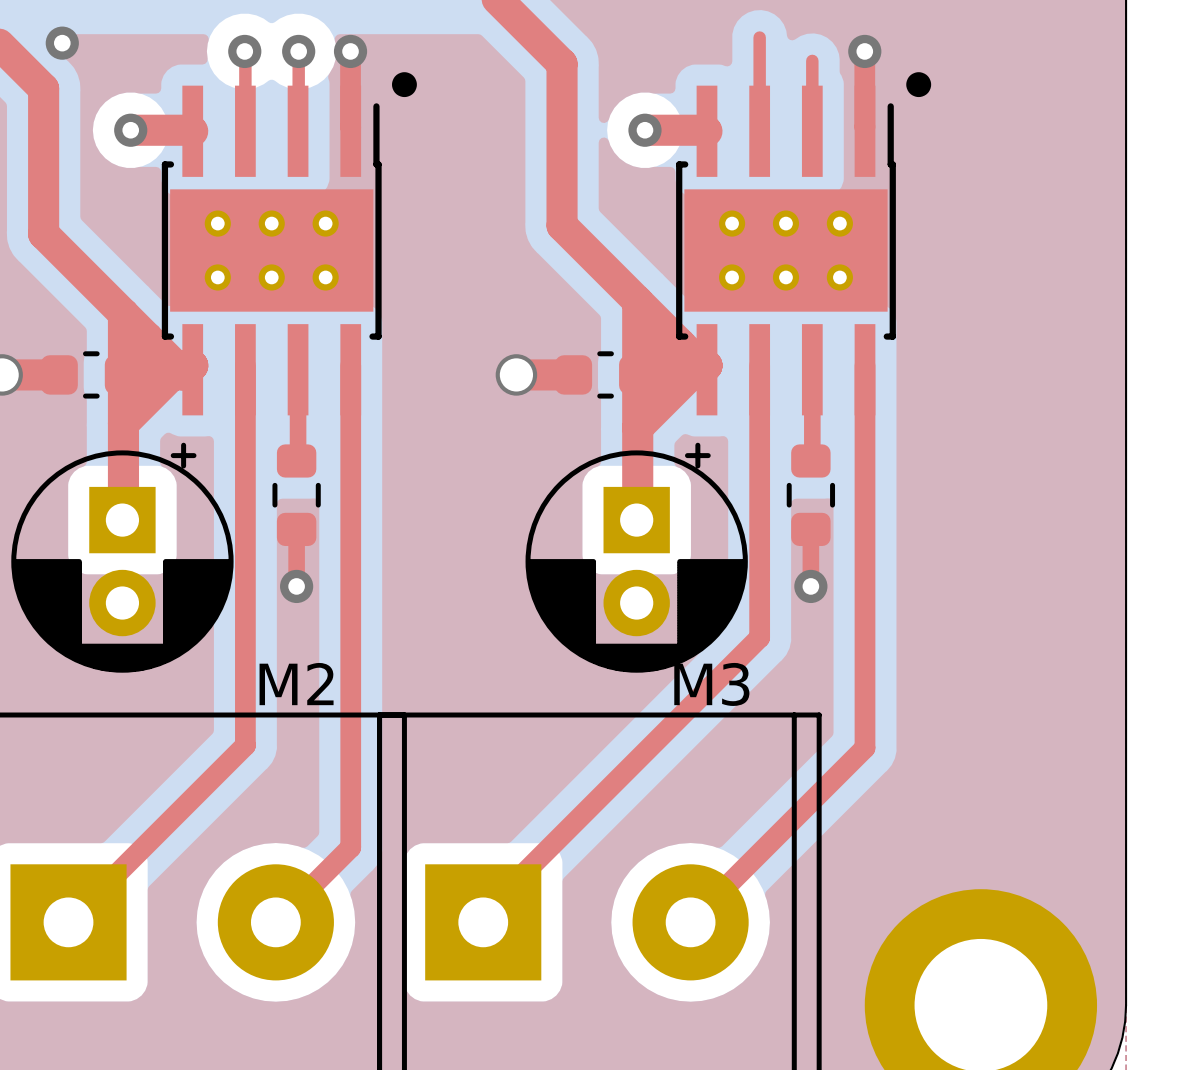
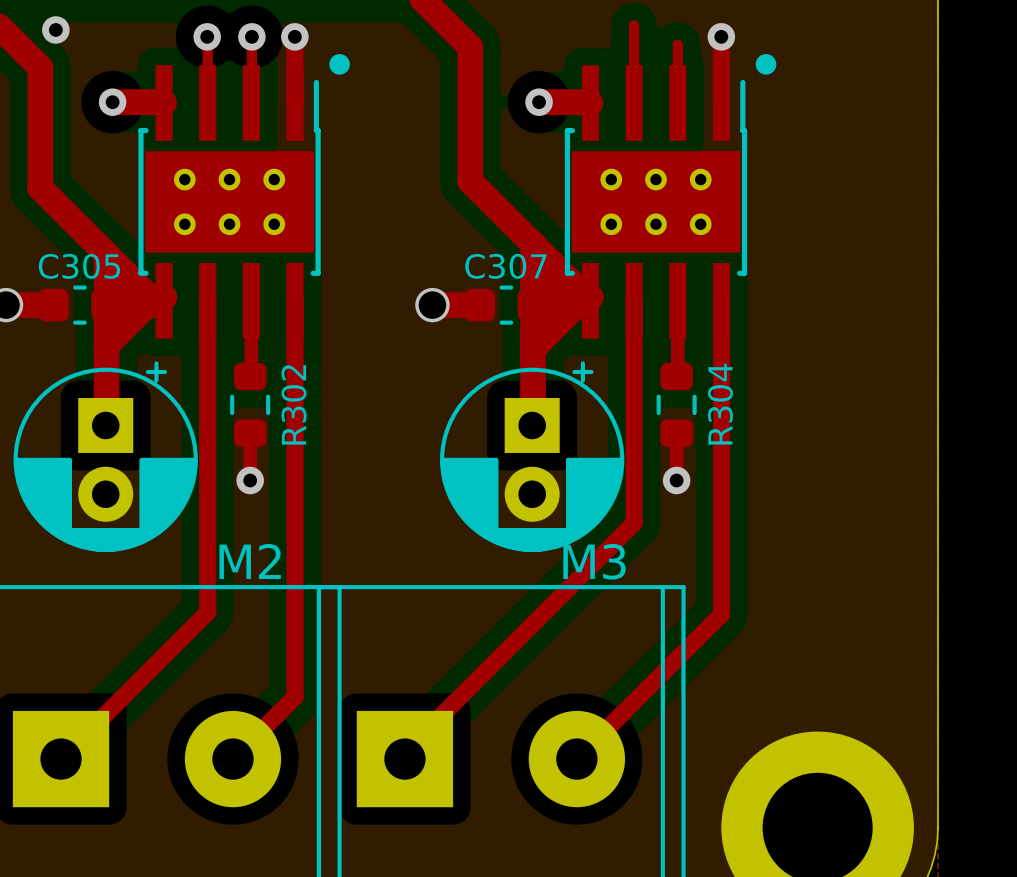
C305 name: none -> C305 (79, 266)
C307 name: none -> C307 (505, 266)
R304 name: none -> R304 (720, 404)
R302 name: none -> R302 (294, 404)

